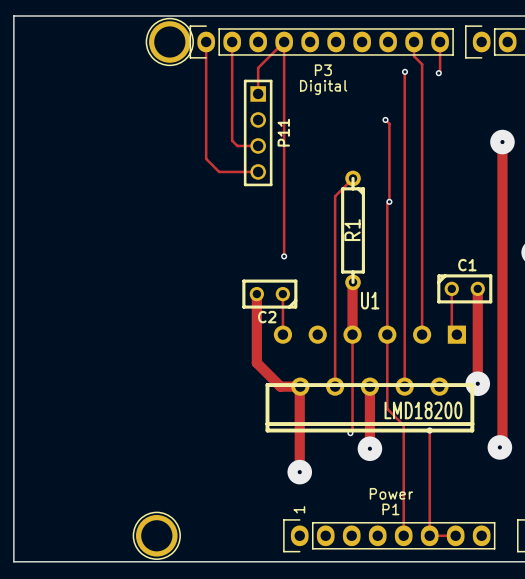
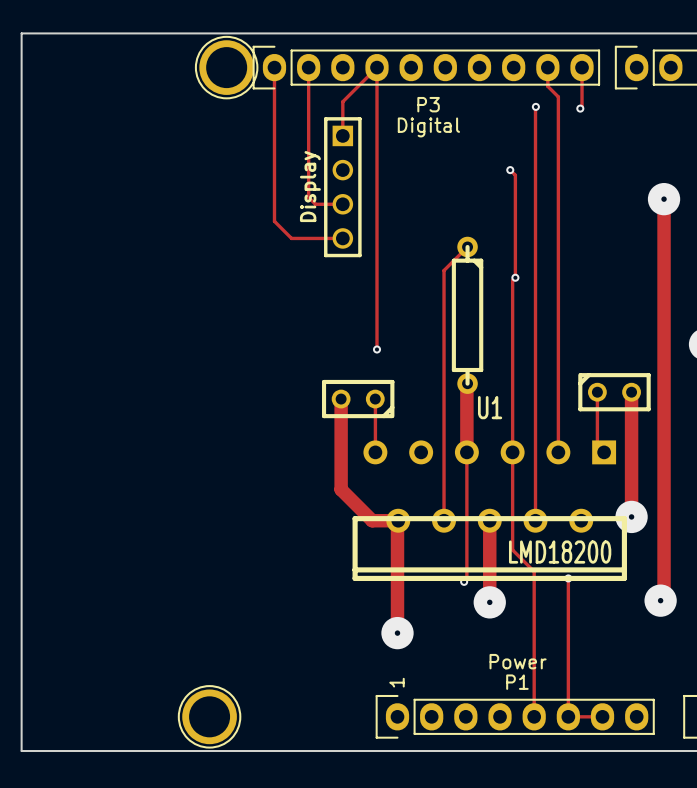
P11 value: none -> Display (310, 186)
P11 name: P11 (283, 132) -> none
R1 name: R1 (352, 230) -> none
C1 name: C1 (467, 265) -> none
C2 name: C2 (267, 317) -> none

